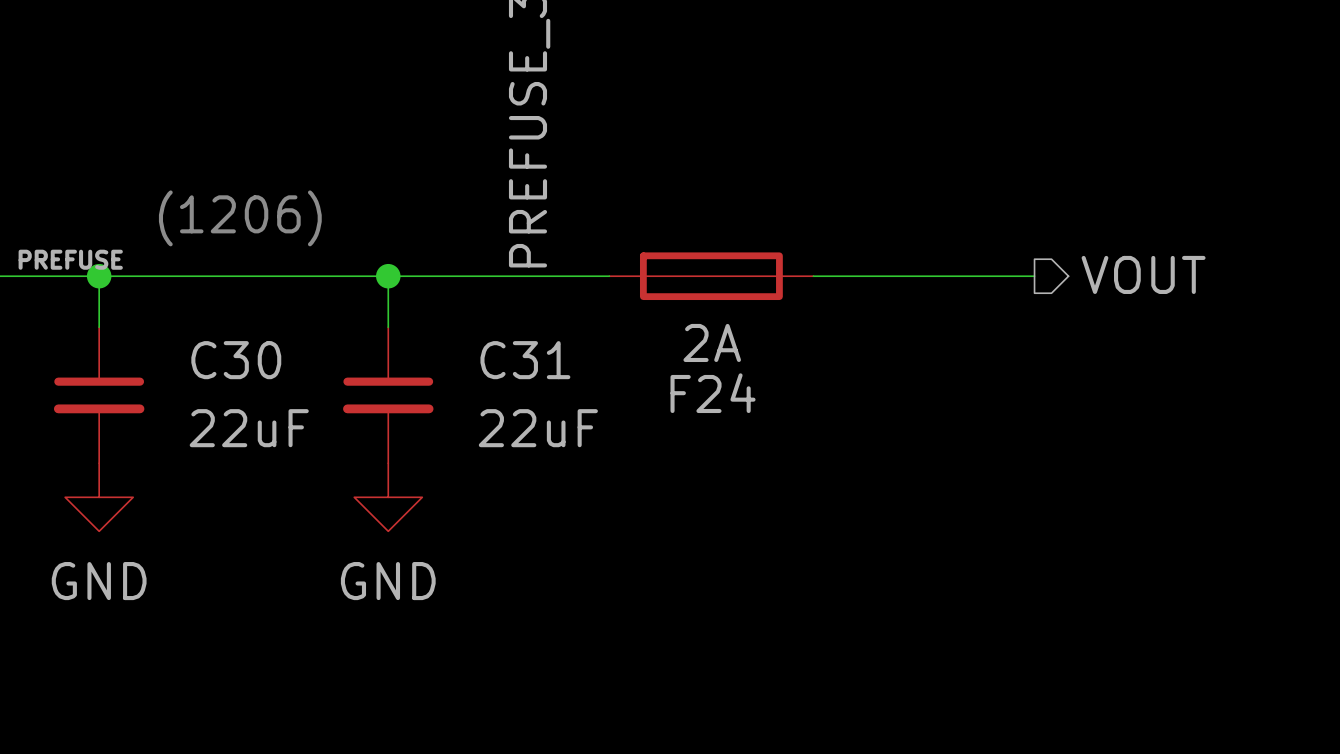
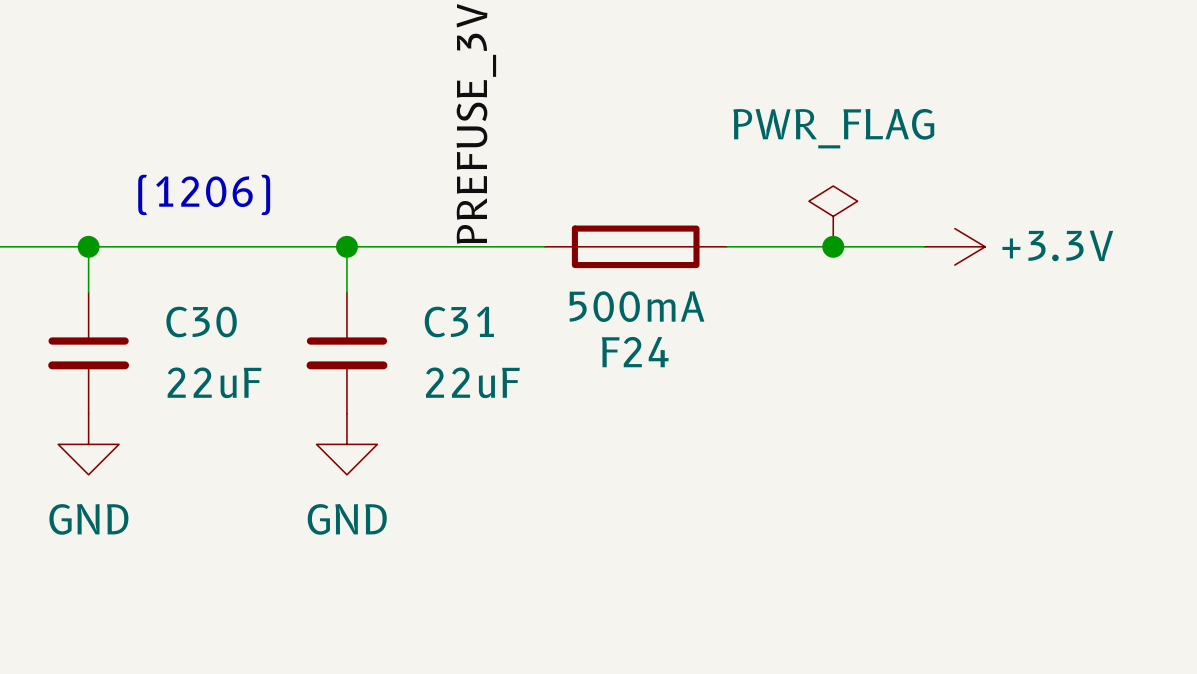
power symbol: none -> PWR_FLAG (833, 216)
label: PREFUSE (70, 259) -> none
hierarchical label: VOUT (1143, 274) -> none
junction: none -> (833, 246)
power symbol: none -> +3.3V (954, 246)
F24 value: 2A (712, 342) -> 500mA (637, 306)

